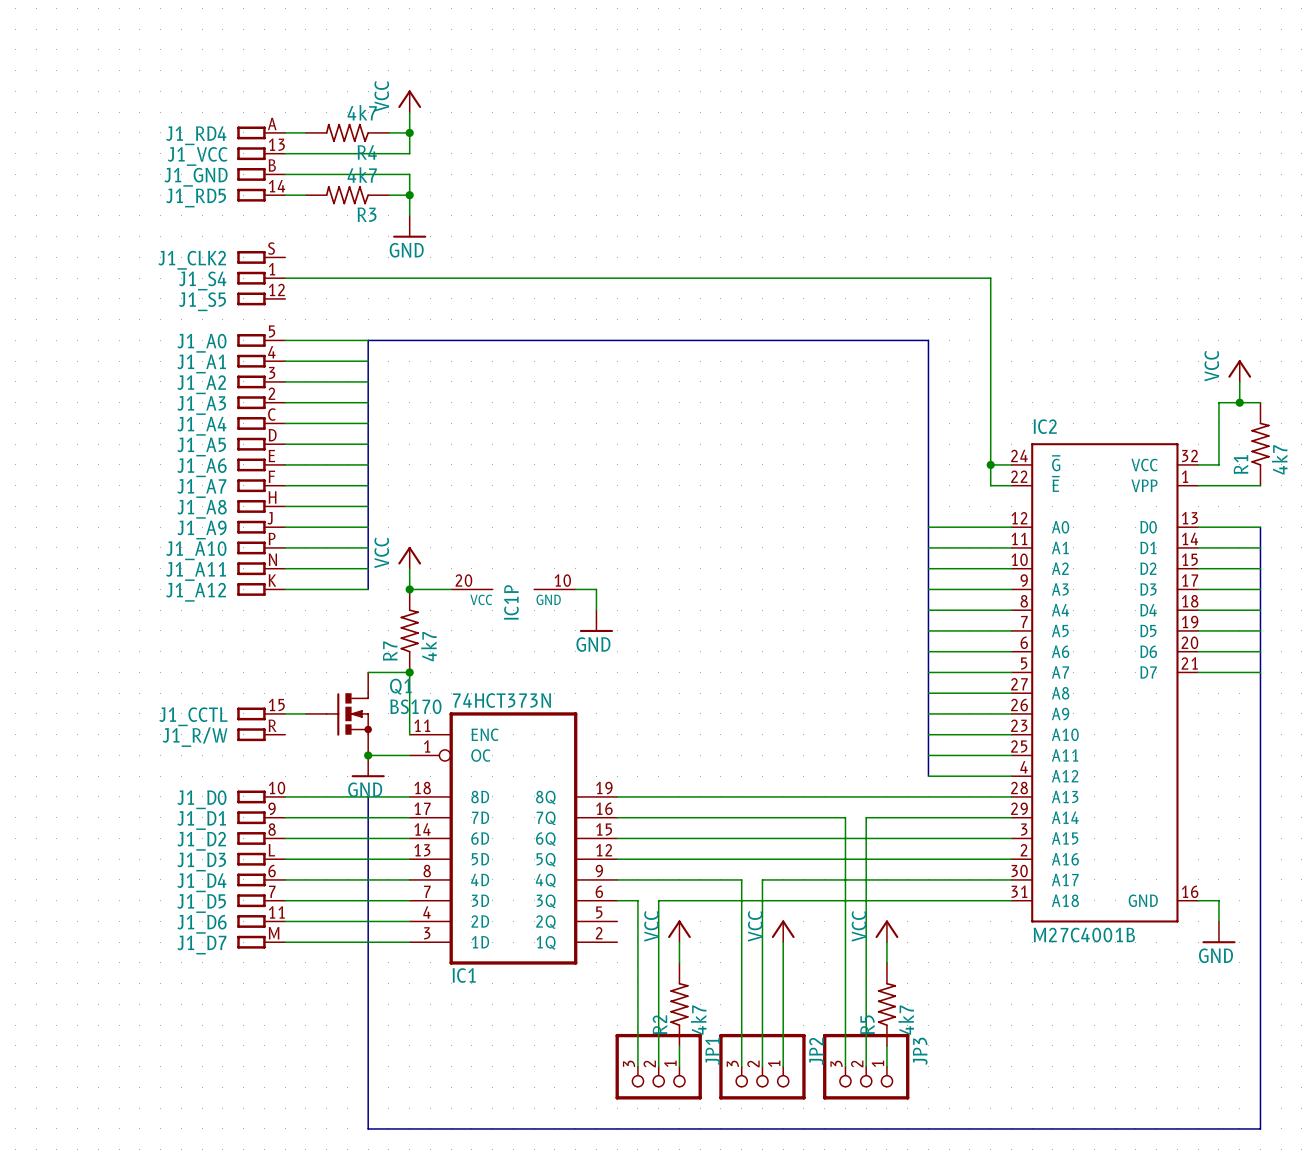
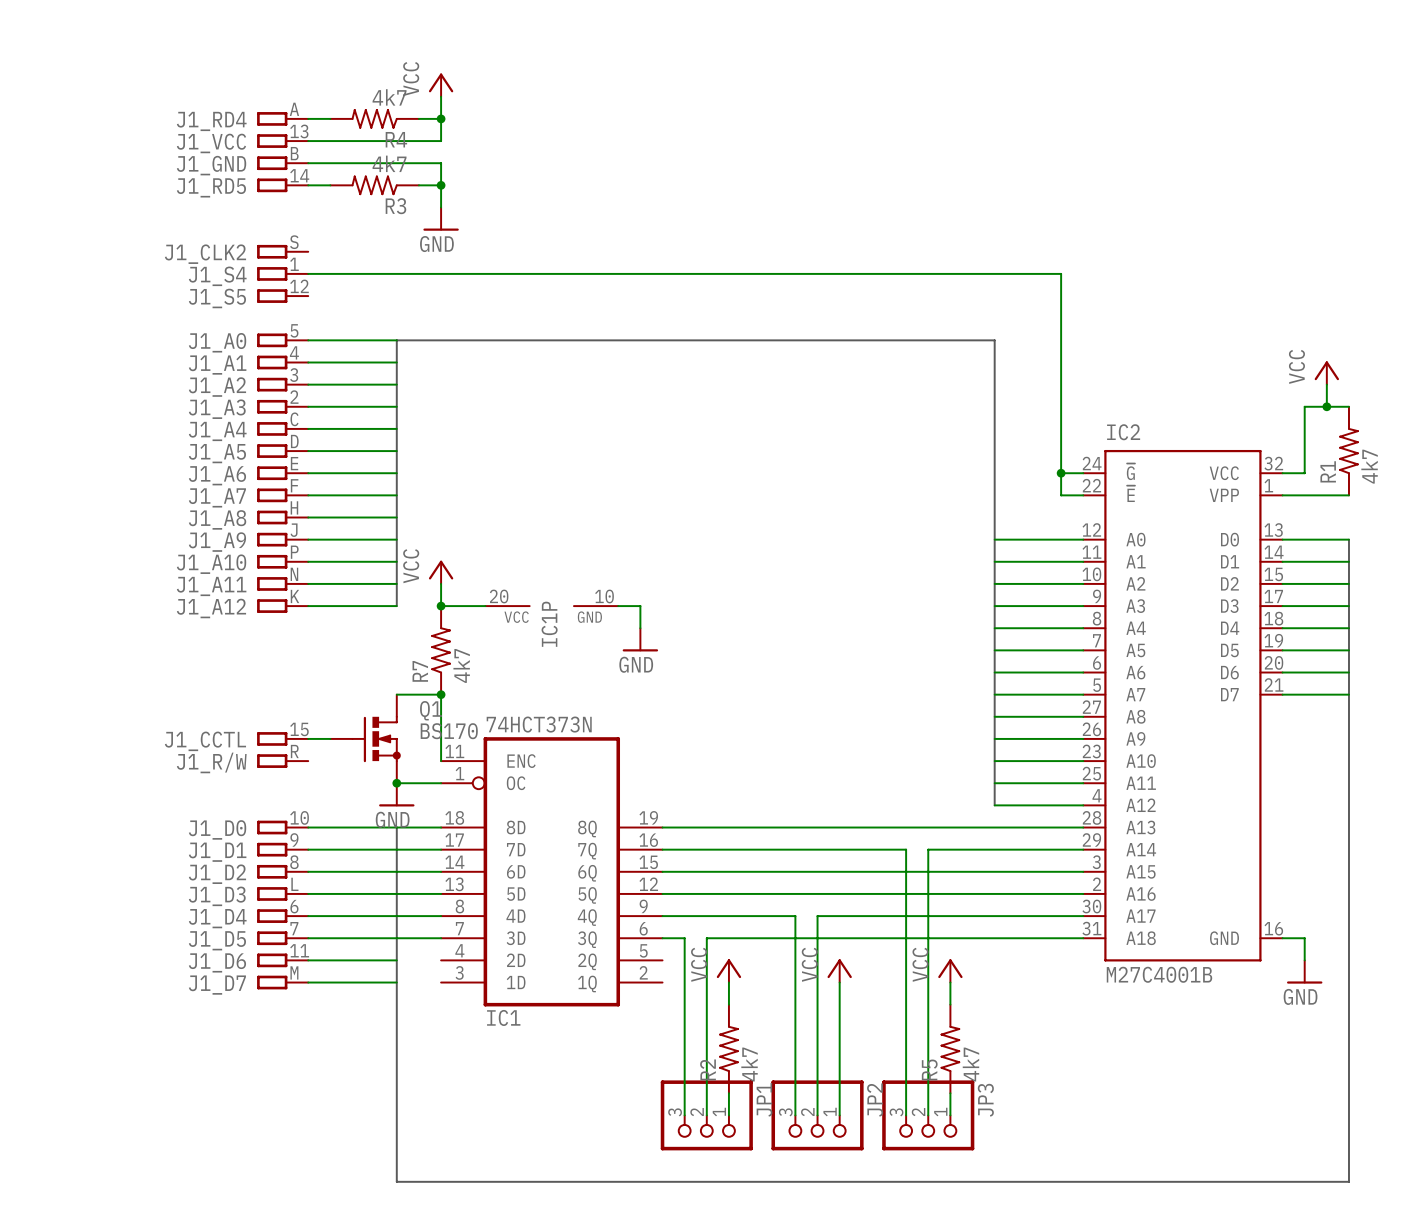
wire: (368, 921) (409, 921) -> none
wire: (368, 942) (409, 942) -> none

